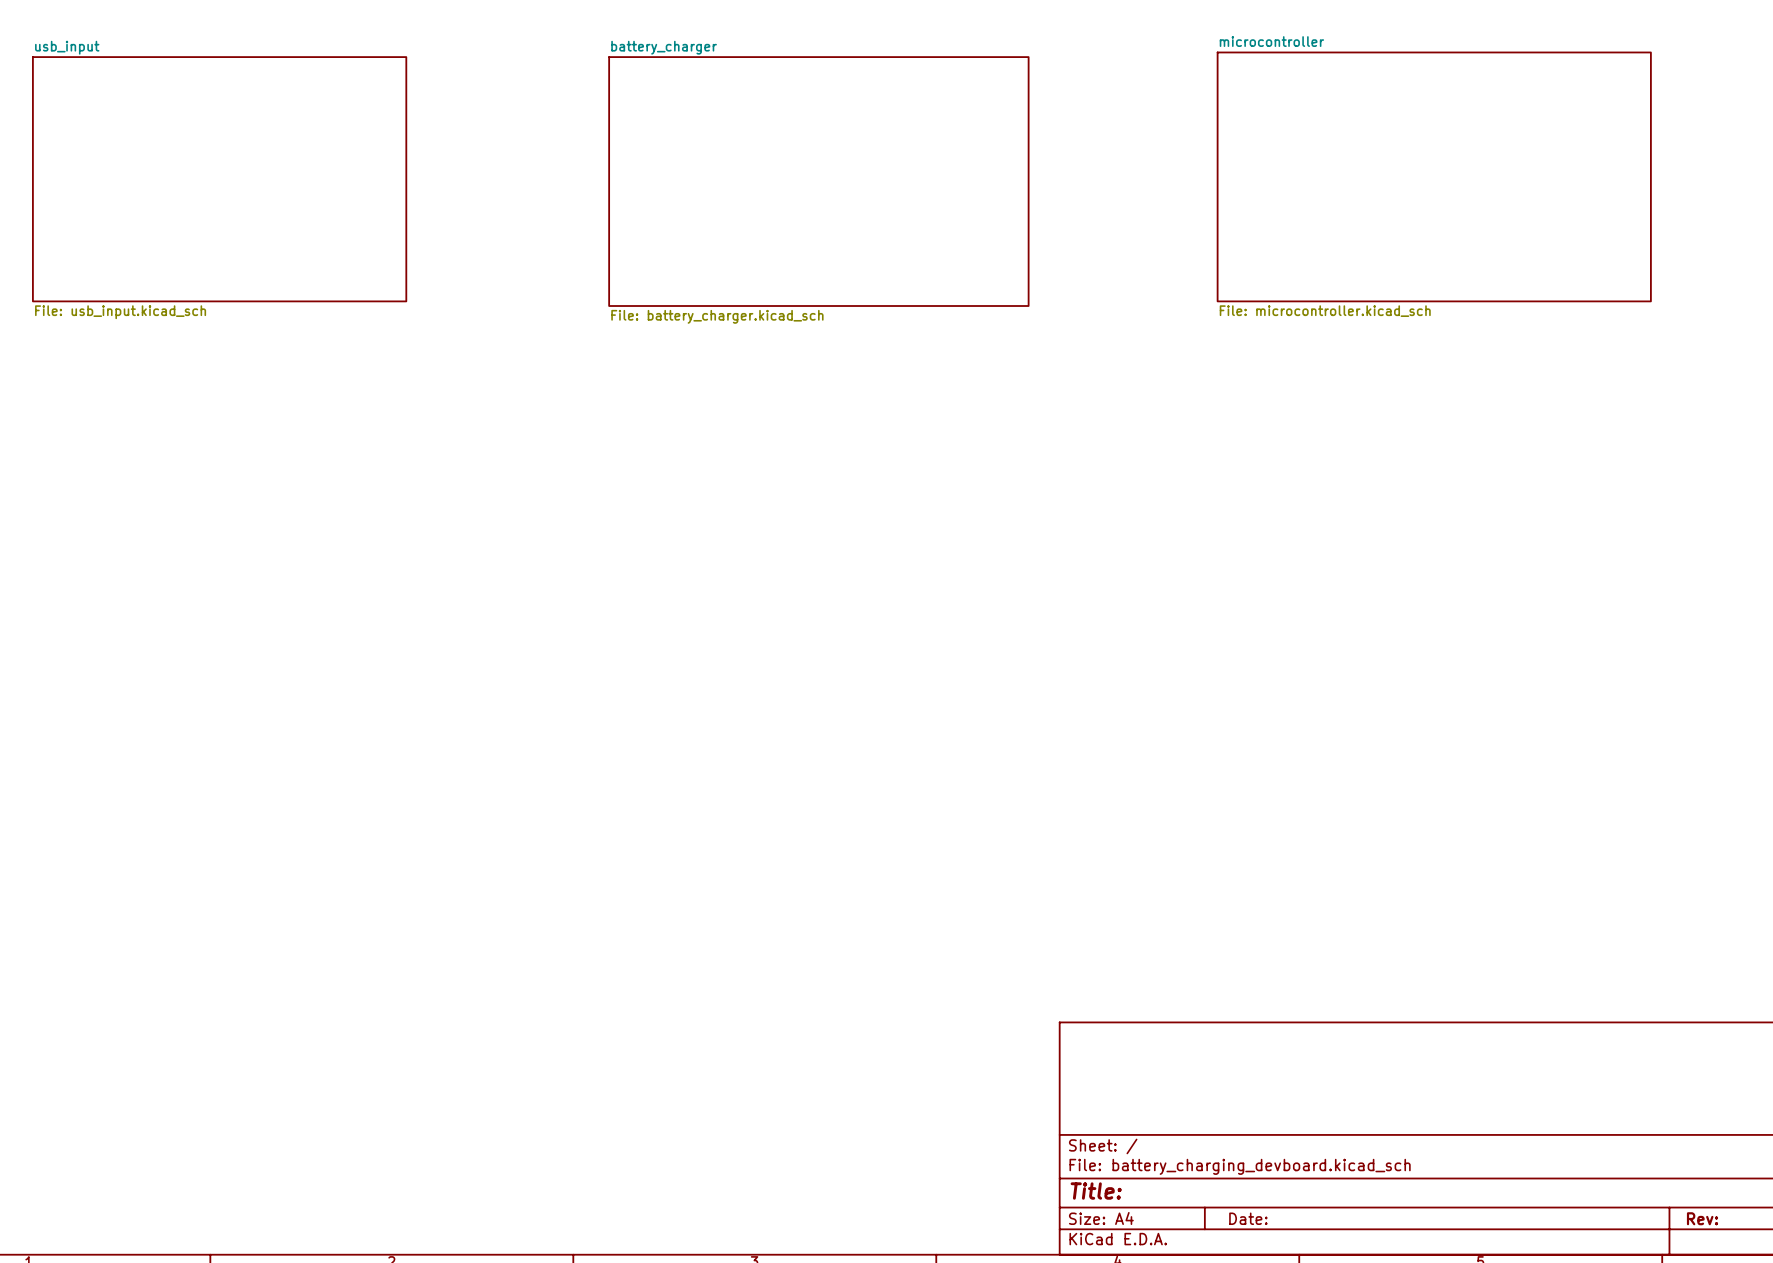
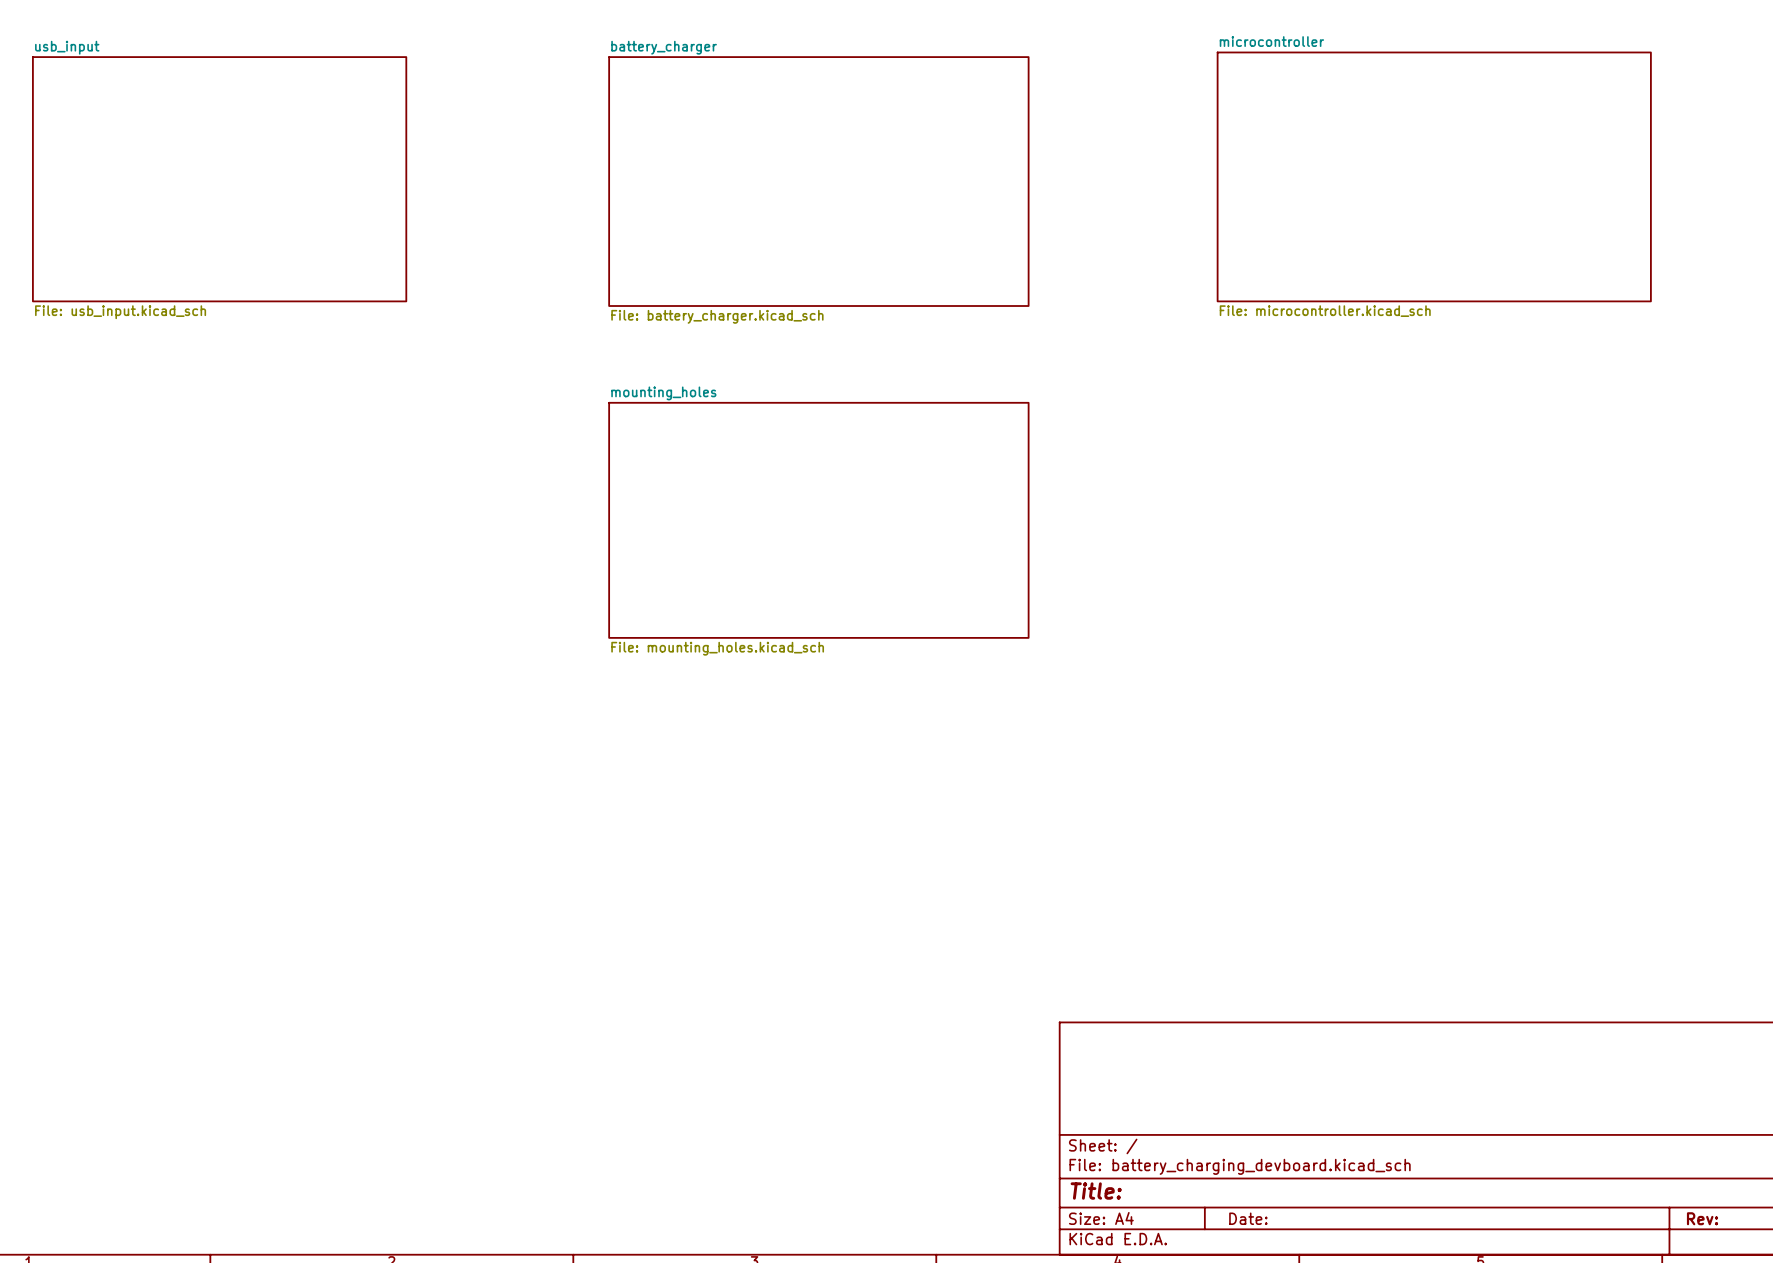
sheet mounting_holes: none -> File: mounting_holes.kicad_sch (818, 520)

